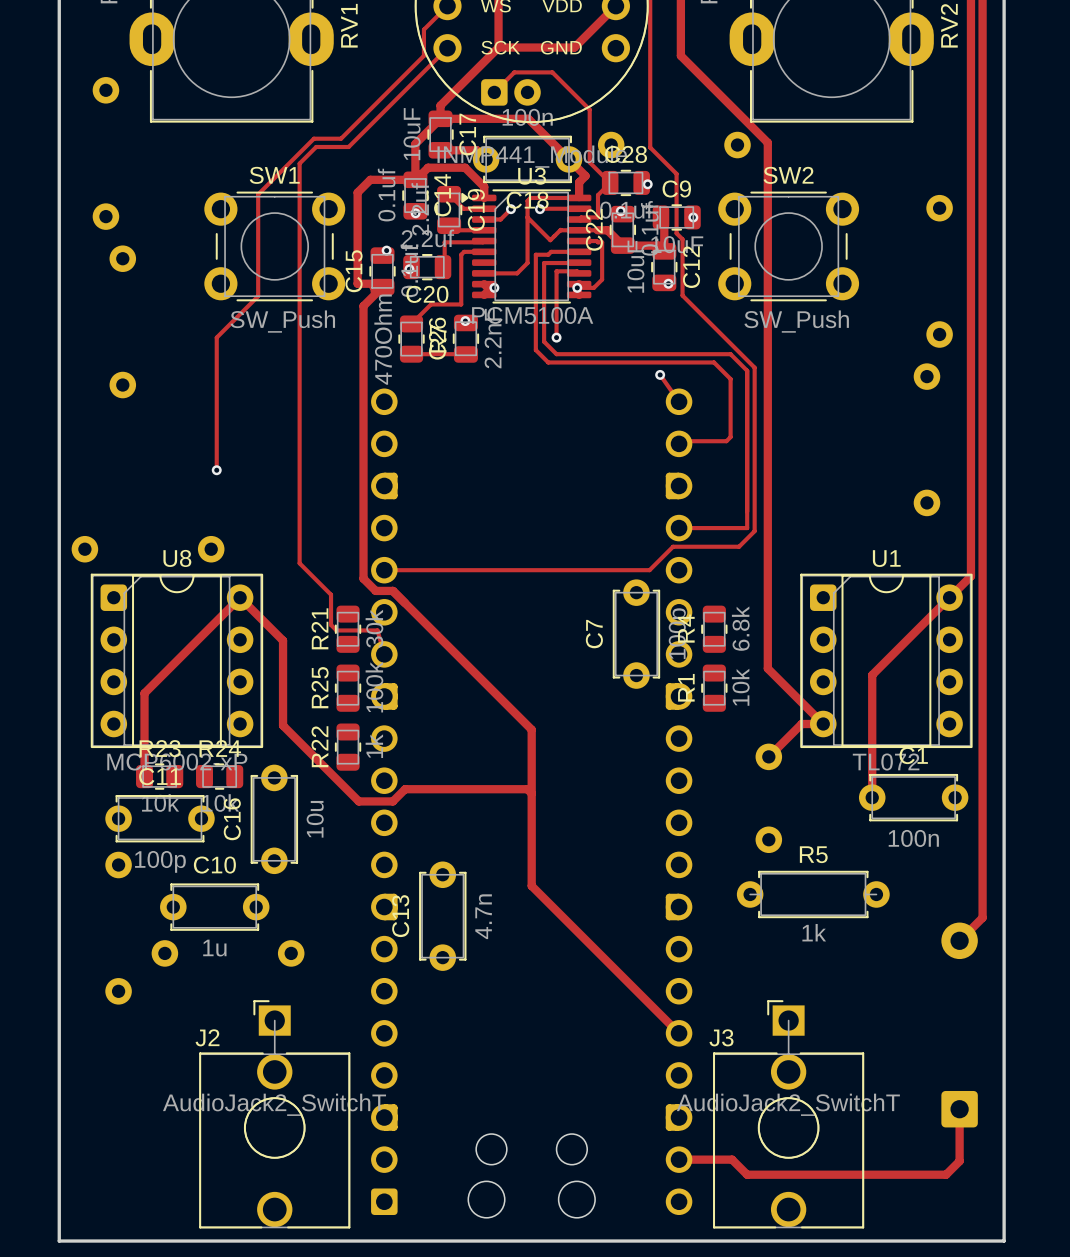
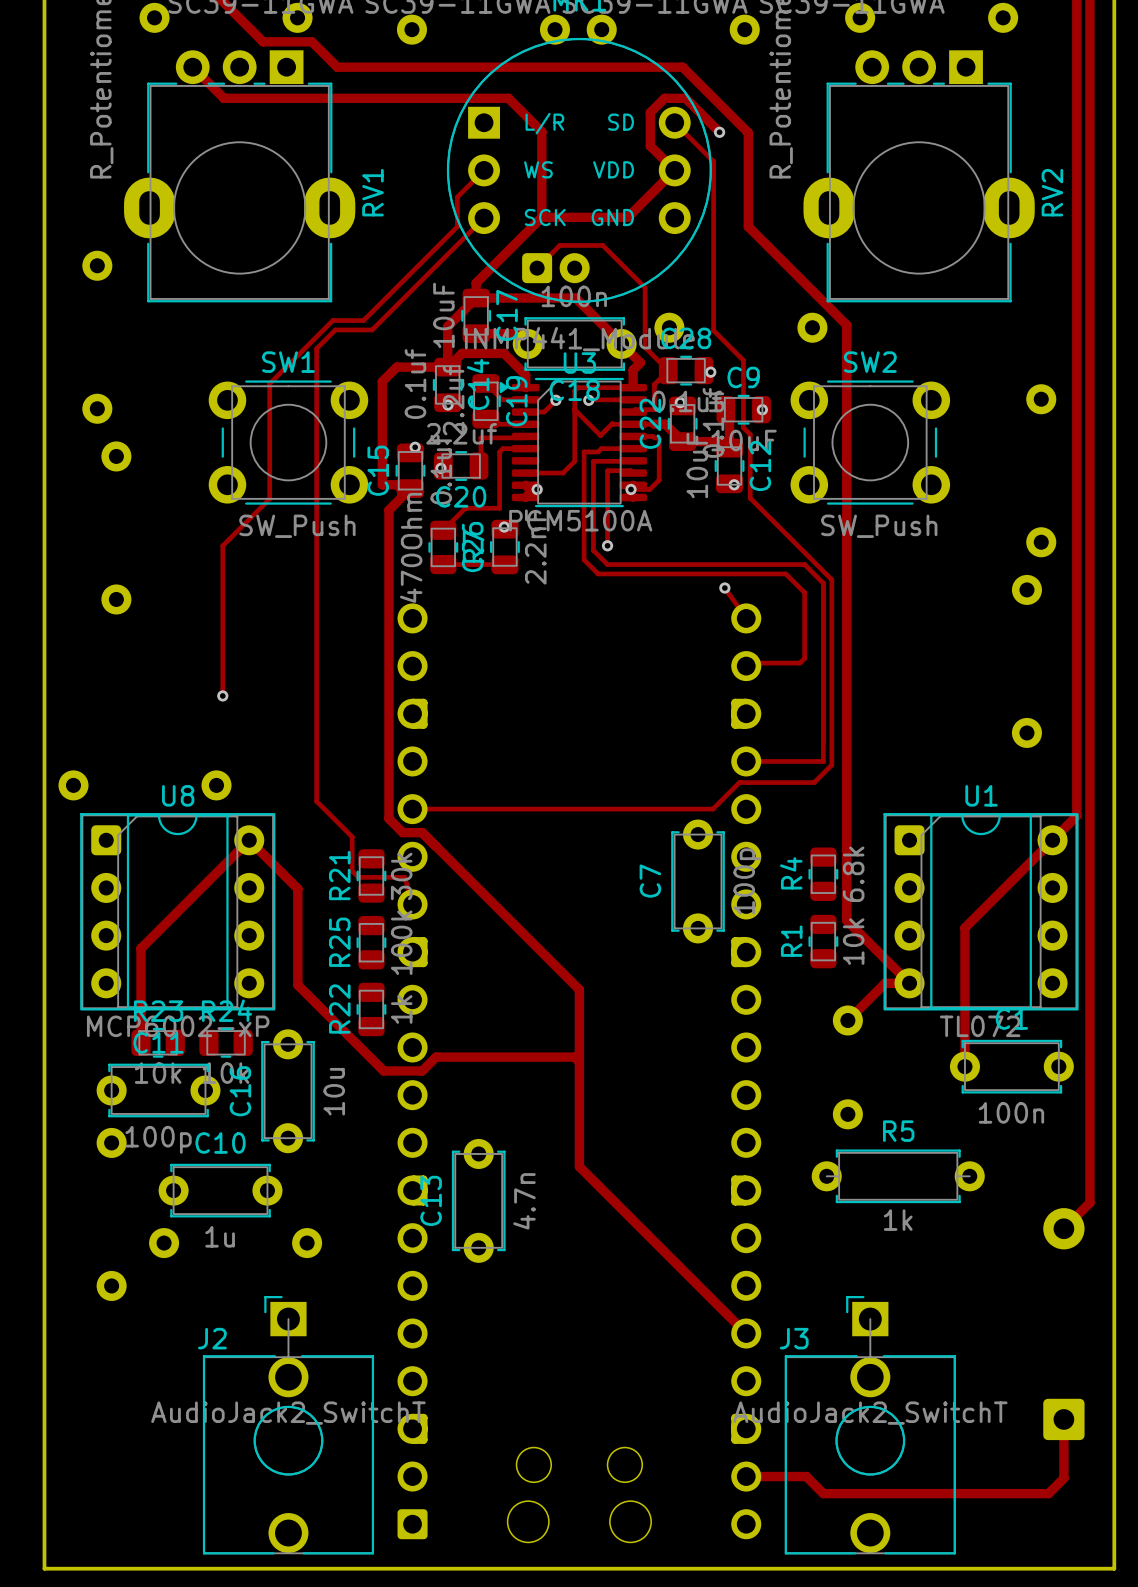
R4 position: (714, 629) -> (823, 874)
R1 position: (714, 688) -> (823, 941)

